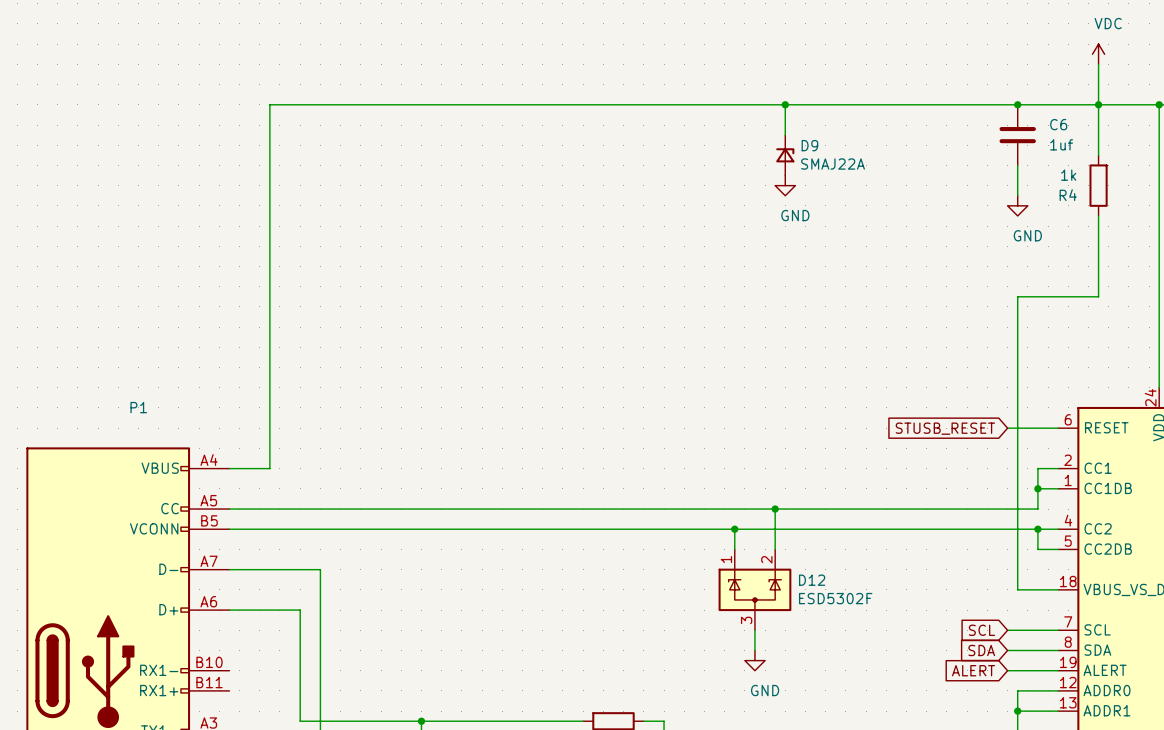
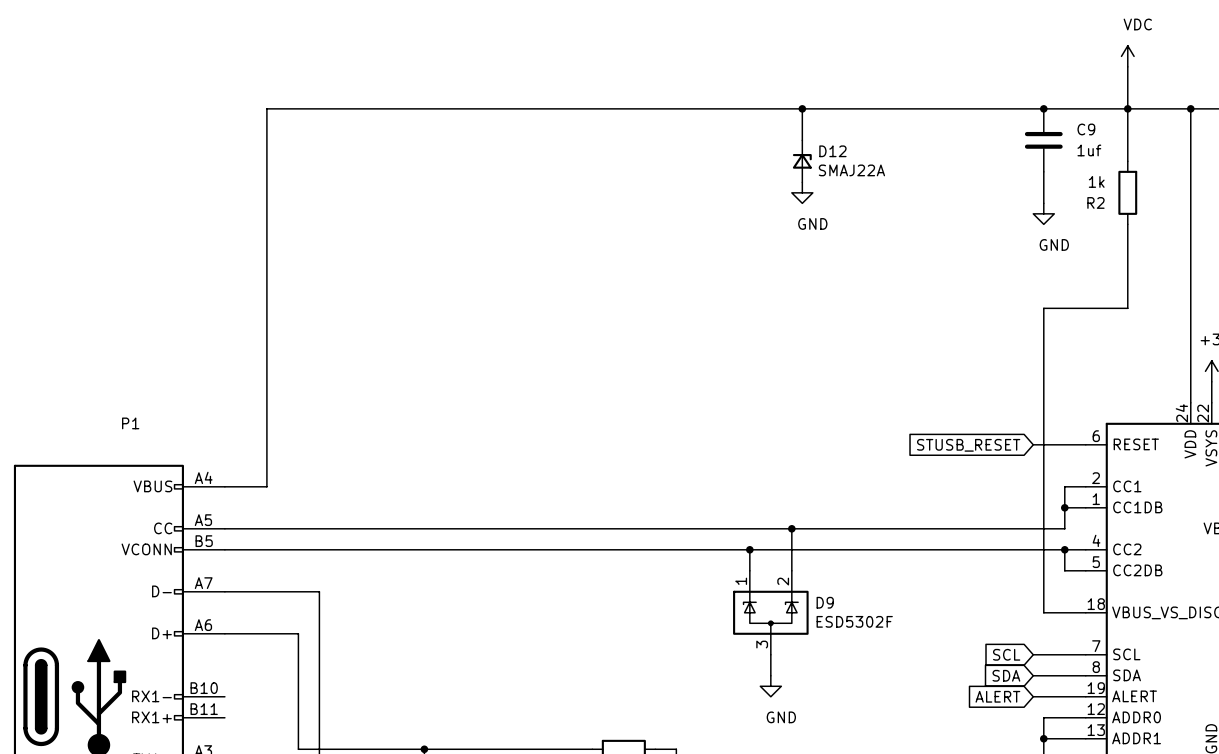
C6 name: C6 (1058, 124) -> C9 (1086, 129)
D9 name: D9 (809, 145) -> D12 (832, 151)
R4 name: R4 (1068, 195) -> R2 (1095, 202)
D12 name: D12 (812, 580) -> D9 (825, 602)

